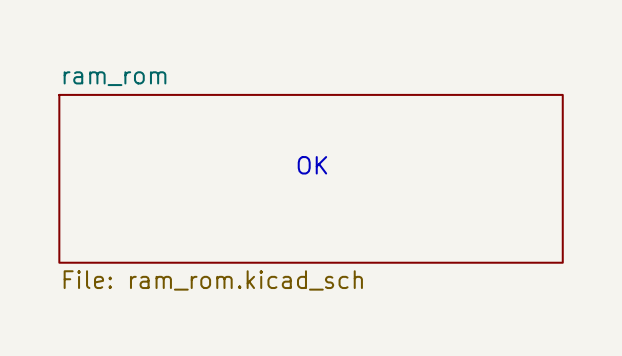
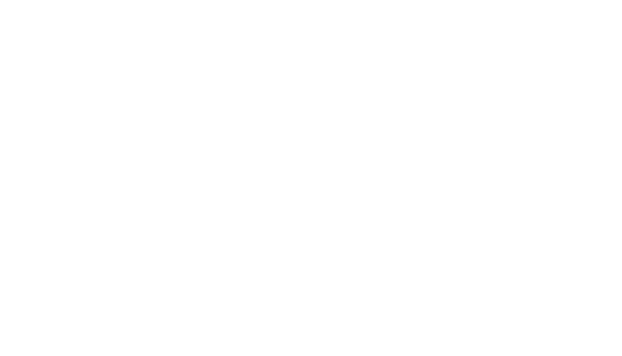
text: OK (312, 165) -> none
sheet ram_rom: File: ram_rom.kicad_sch (311, 178) -> none

